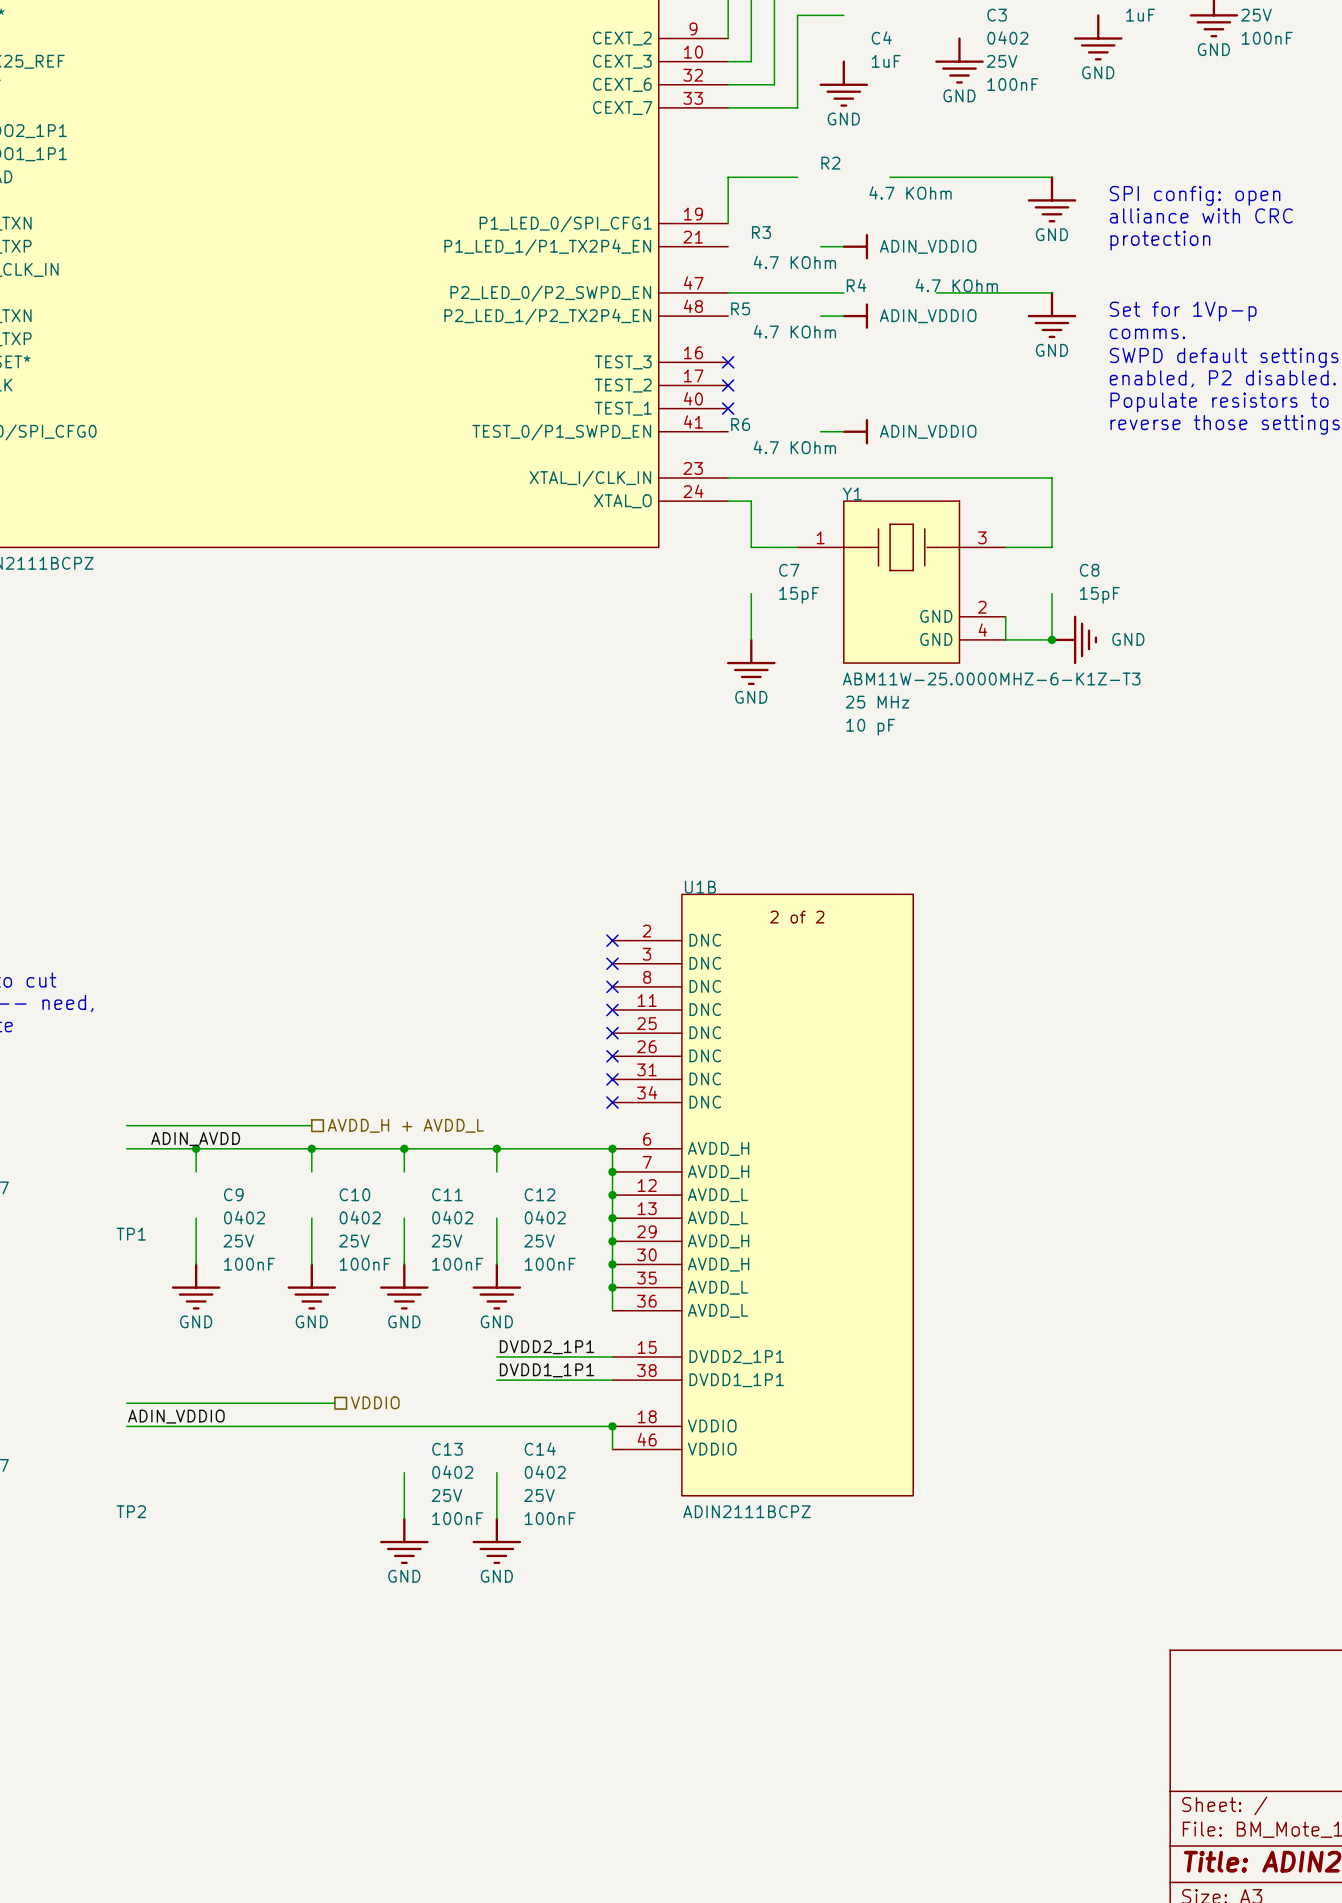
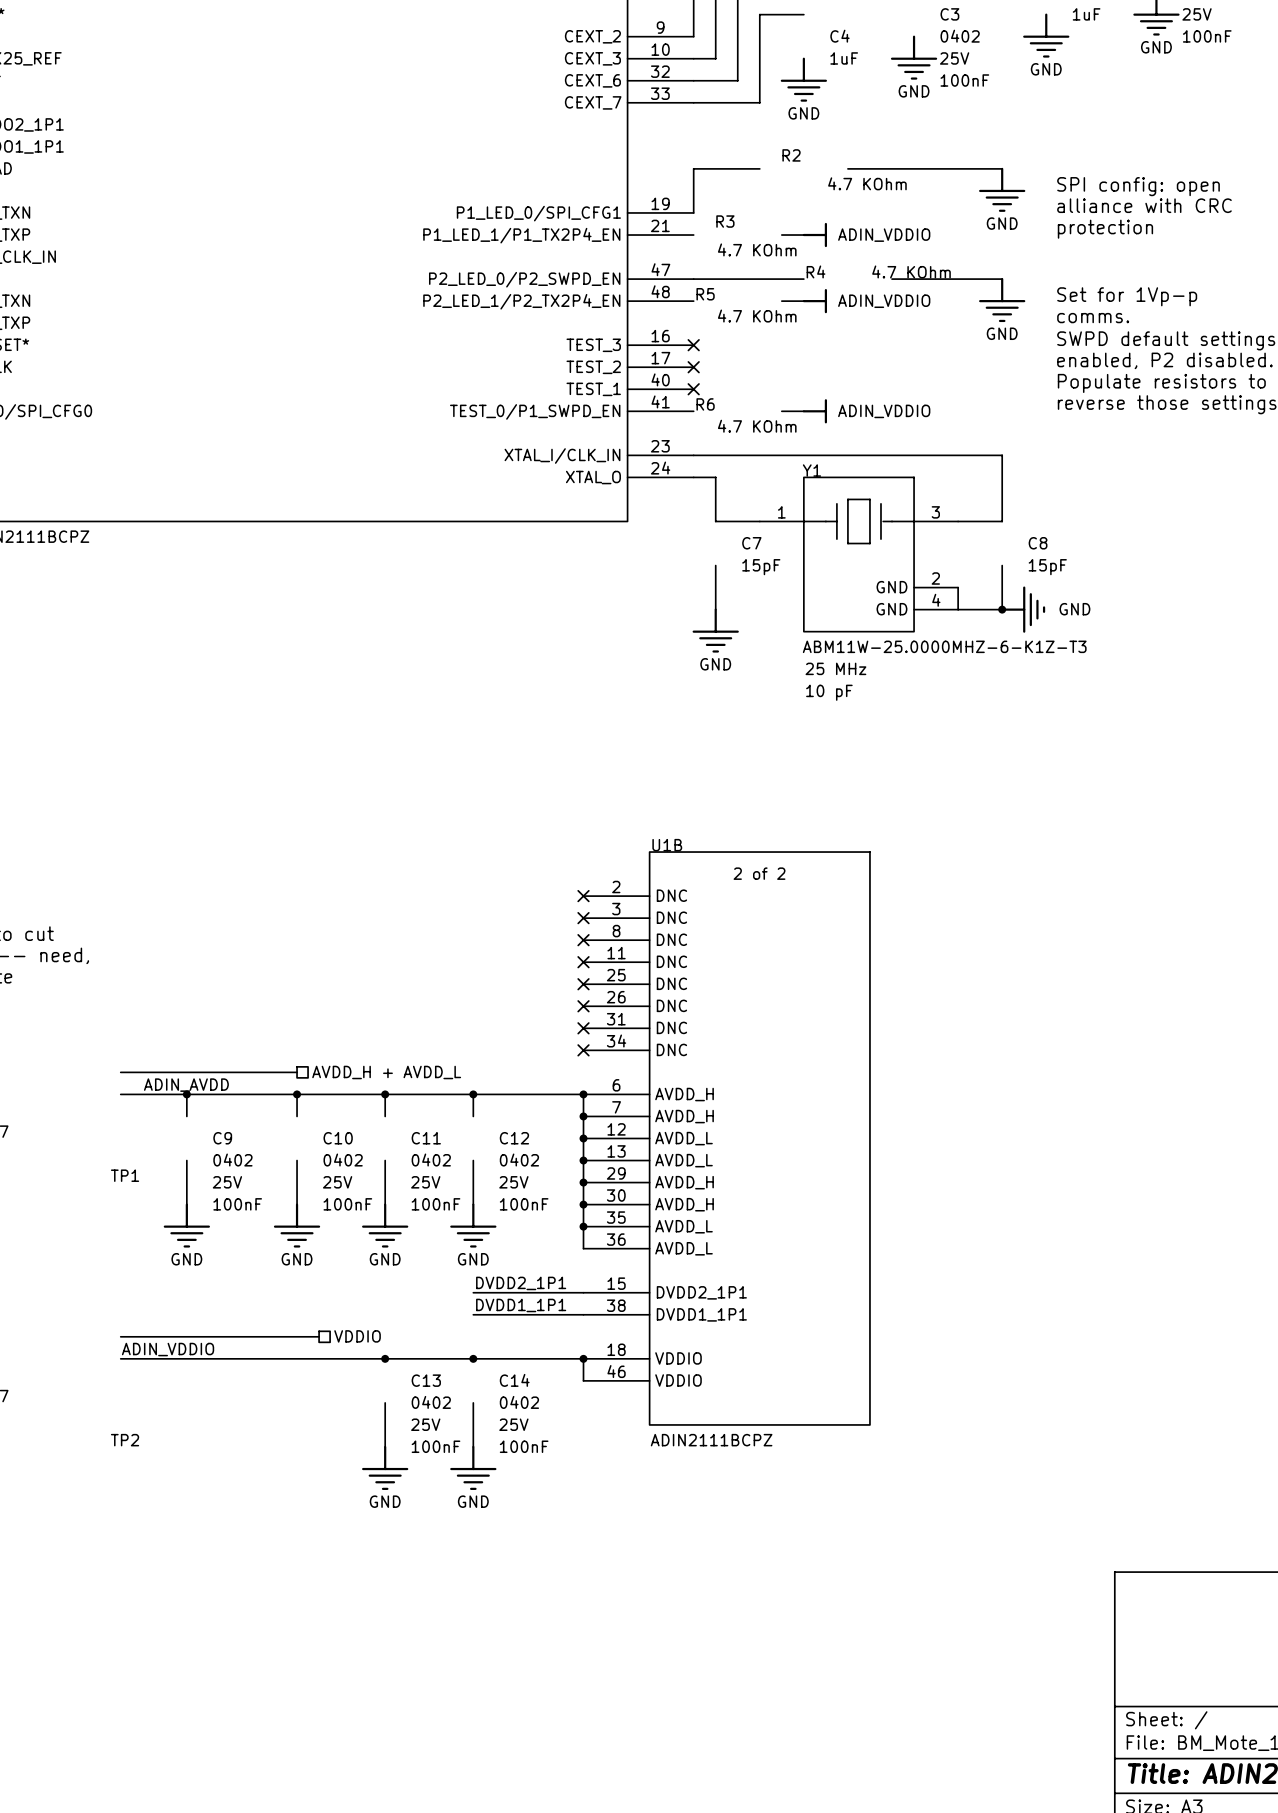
junction: none -> (385, 1358)
junction: none -> (473, 1358)

